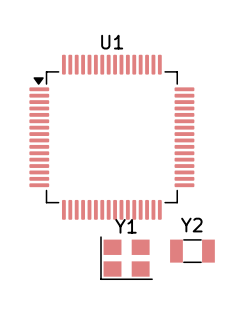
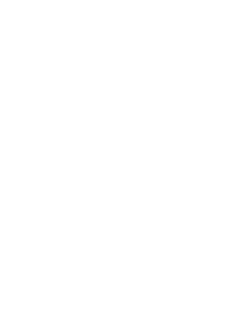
U1: (111, 137) -> none
Y2: (192, 251) -> none
Y1: (126, 258) -> none

